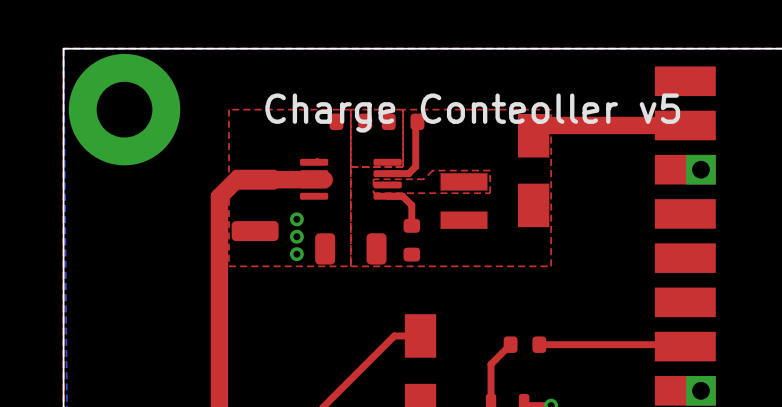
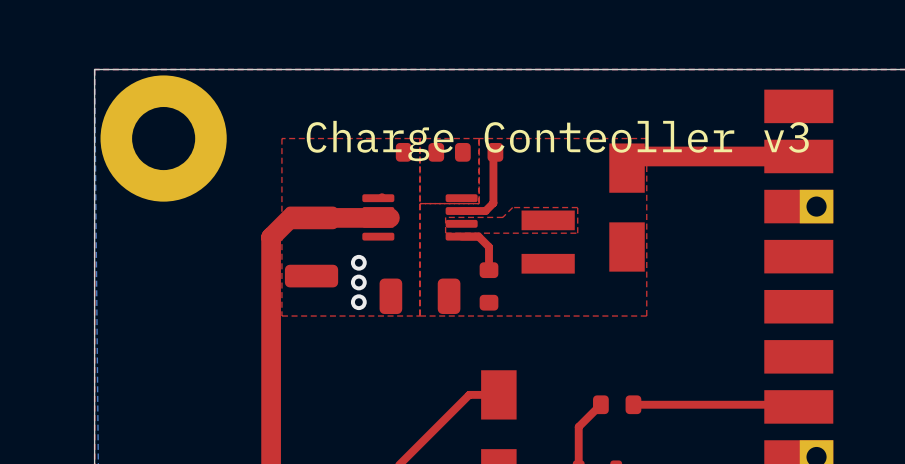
text: Charge Conteoller v5 (472, 113) -> Charge Conteoller v3 (557, 141)

